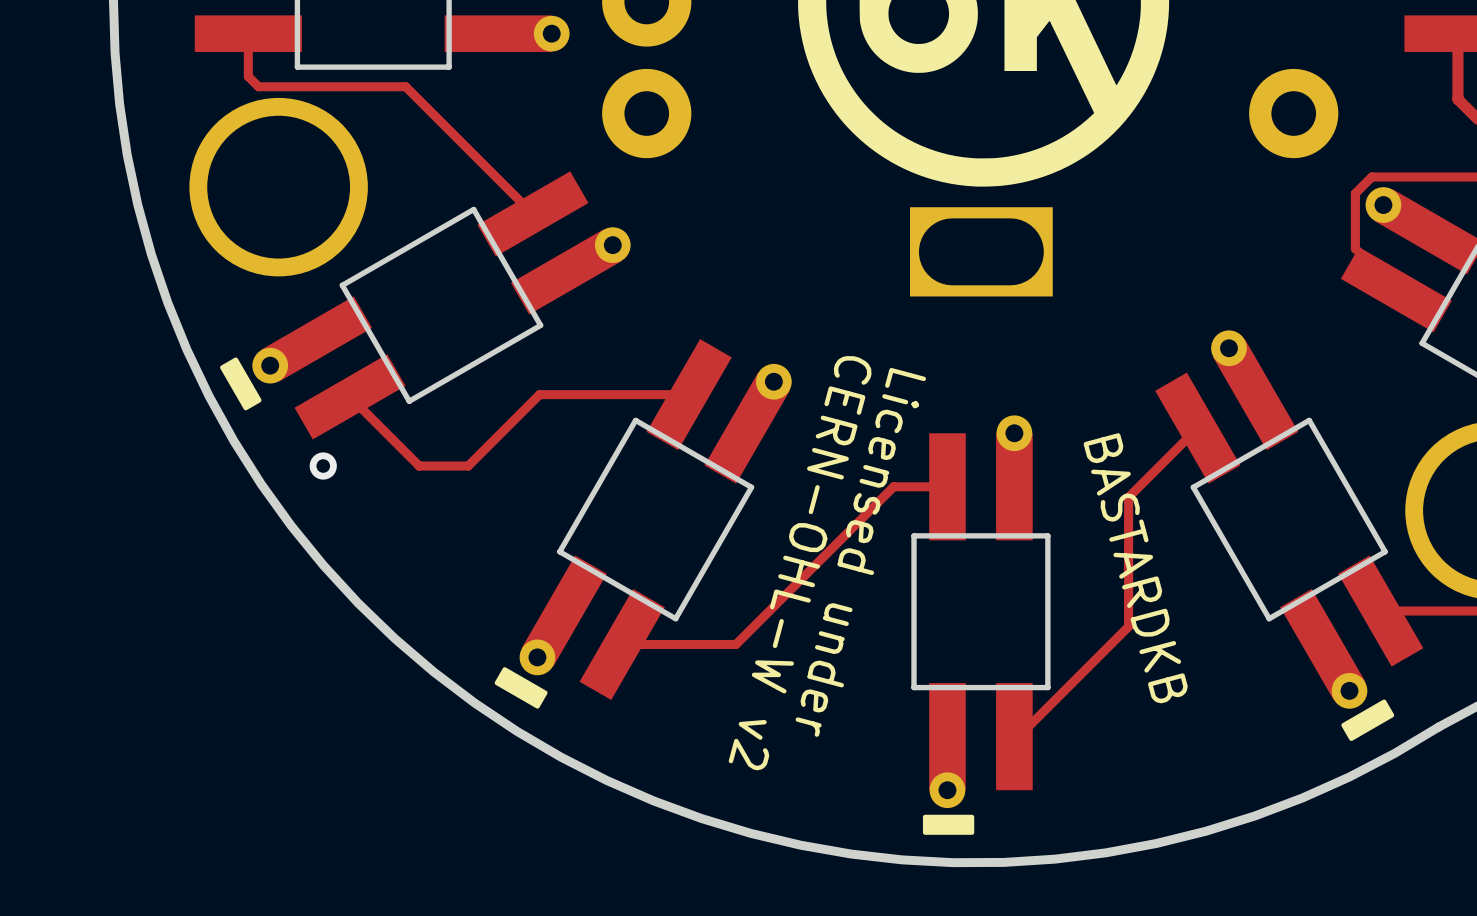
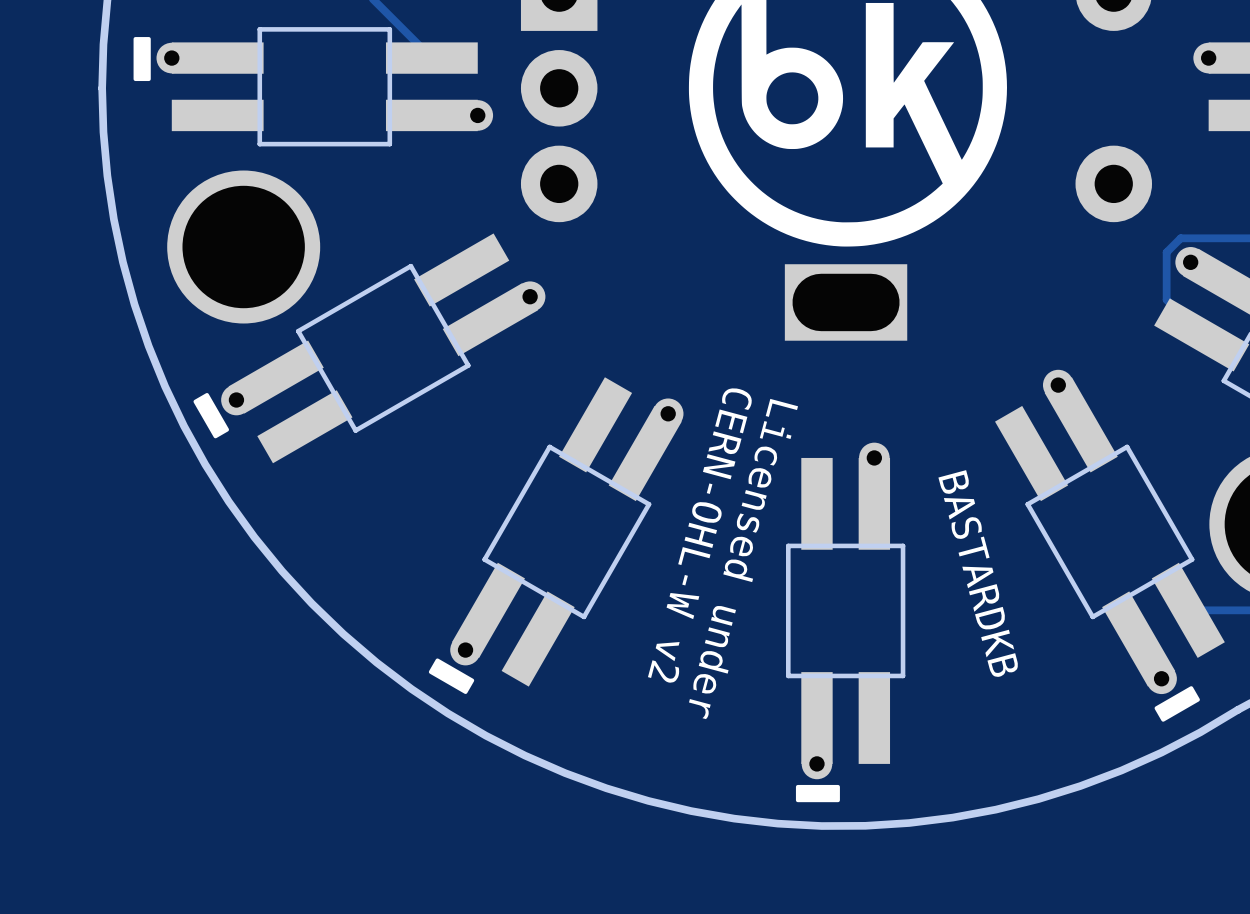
track: (248, 33) (248, 76) (258, 86) (405, 86) (532, 213) -> none
track: (689, 394) (539, 394) (468, 466) (419, 466) (350, 396) -> none
track: (1197, 428) (1128, 497) (1128, 626) (1018, 736) (1014, 736) -> none
via: (323, 466) -> none
track: (947, 486) (893, 486) (735, 644) (622, 644) -> none

